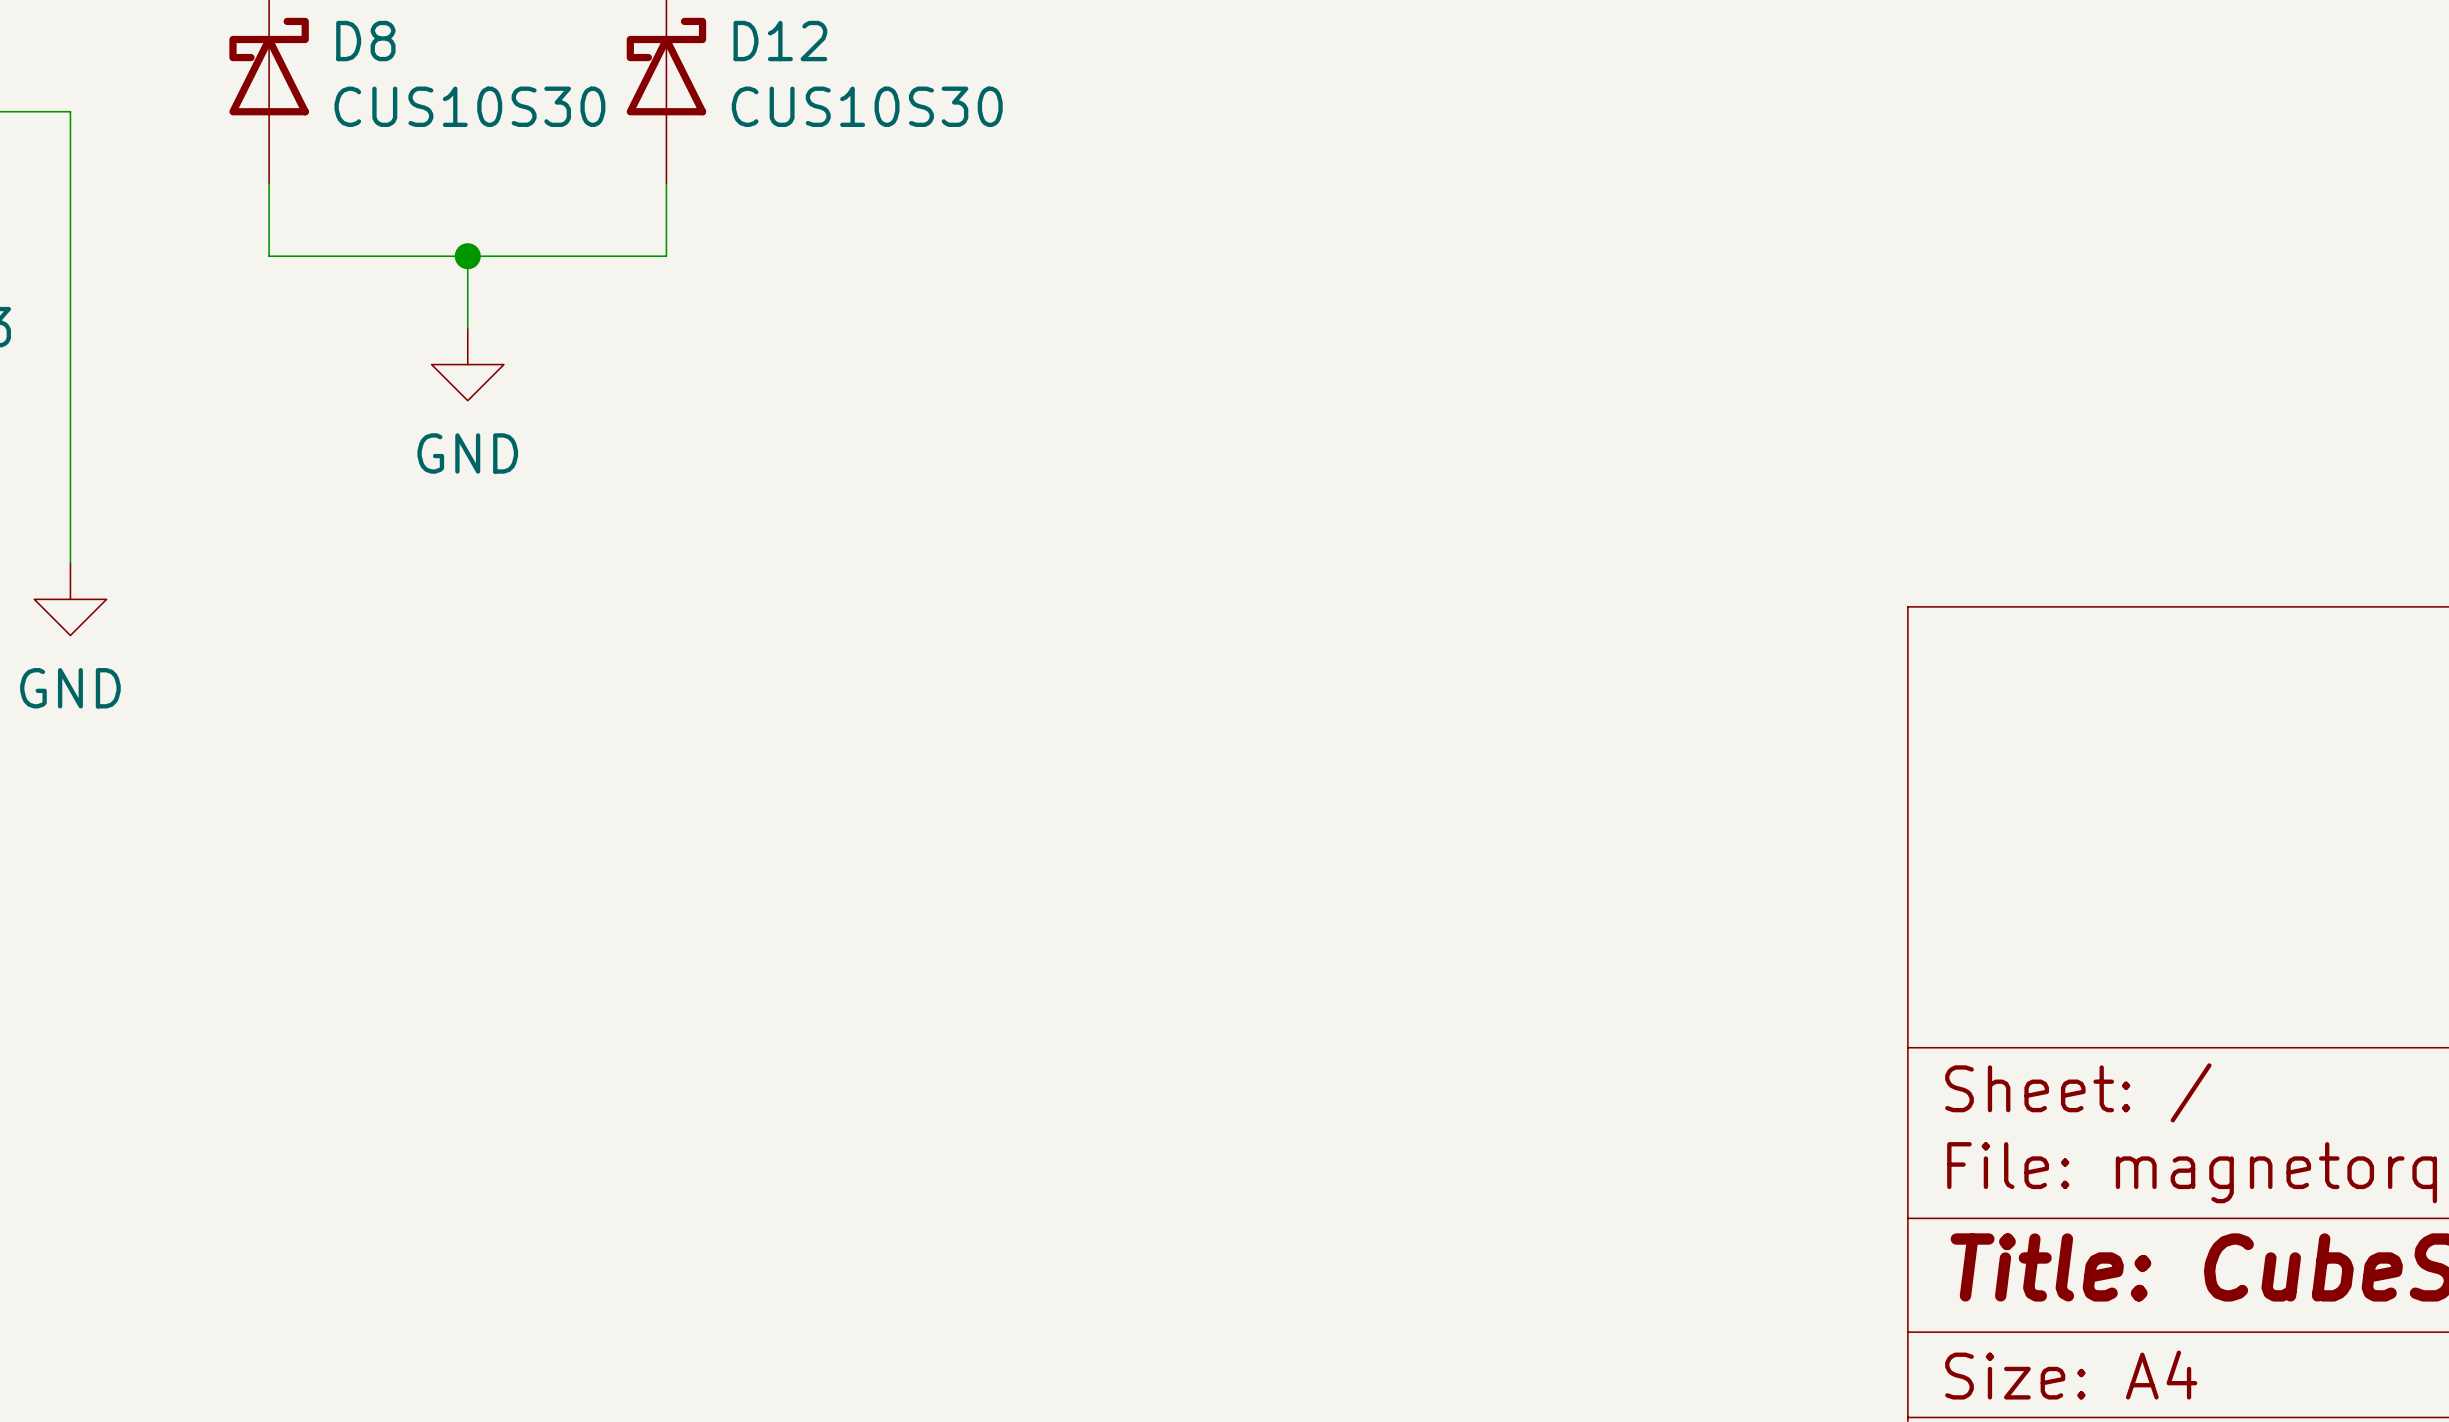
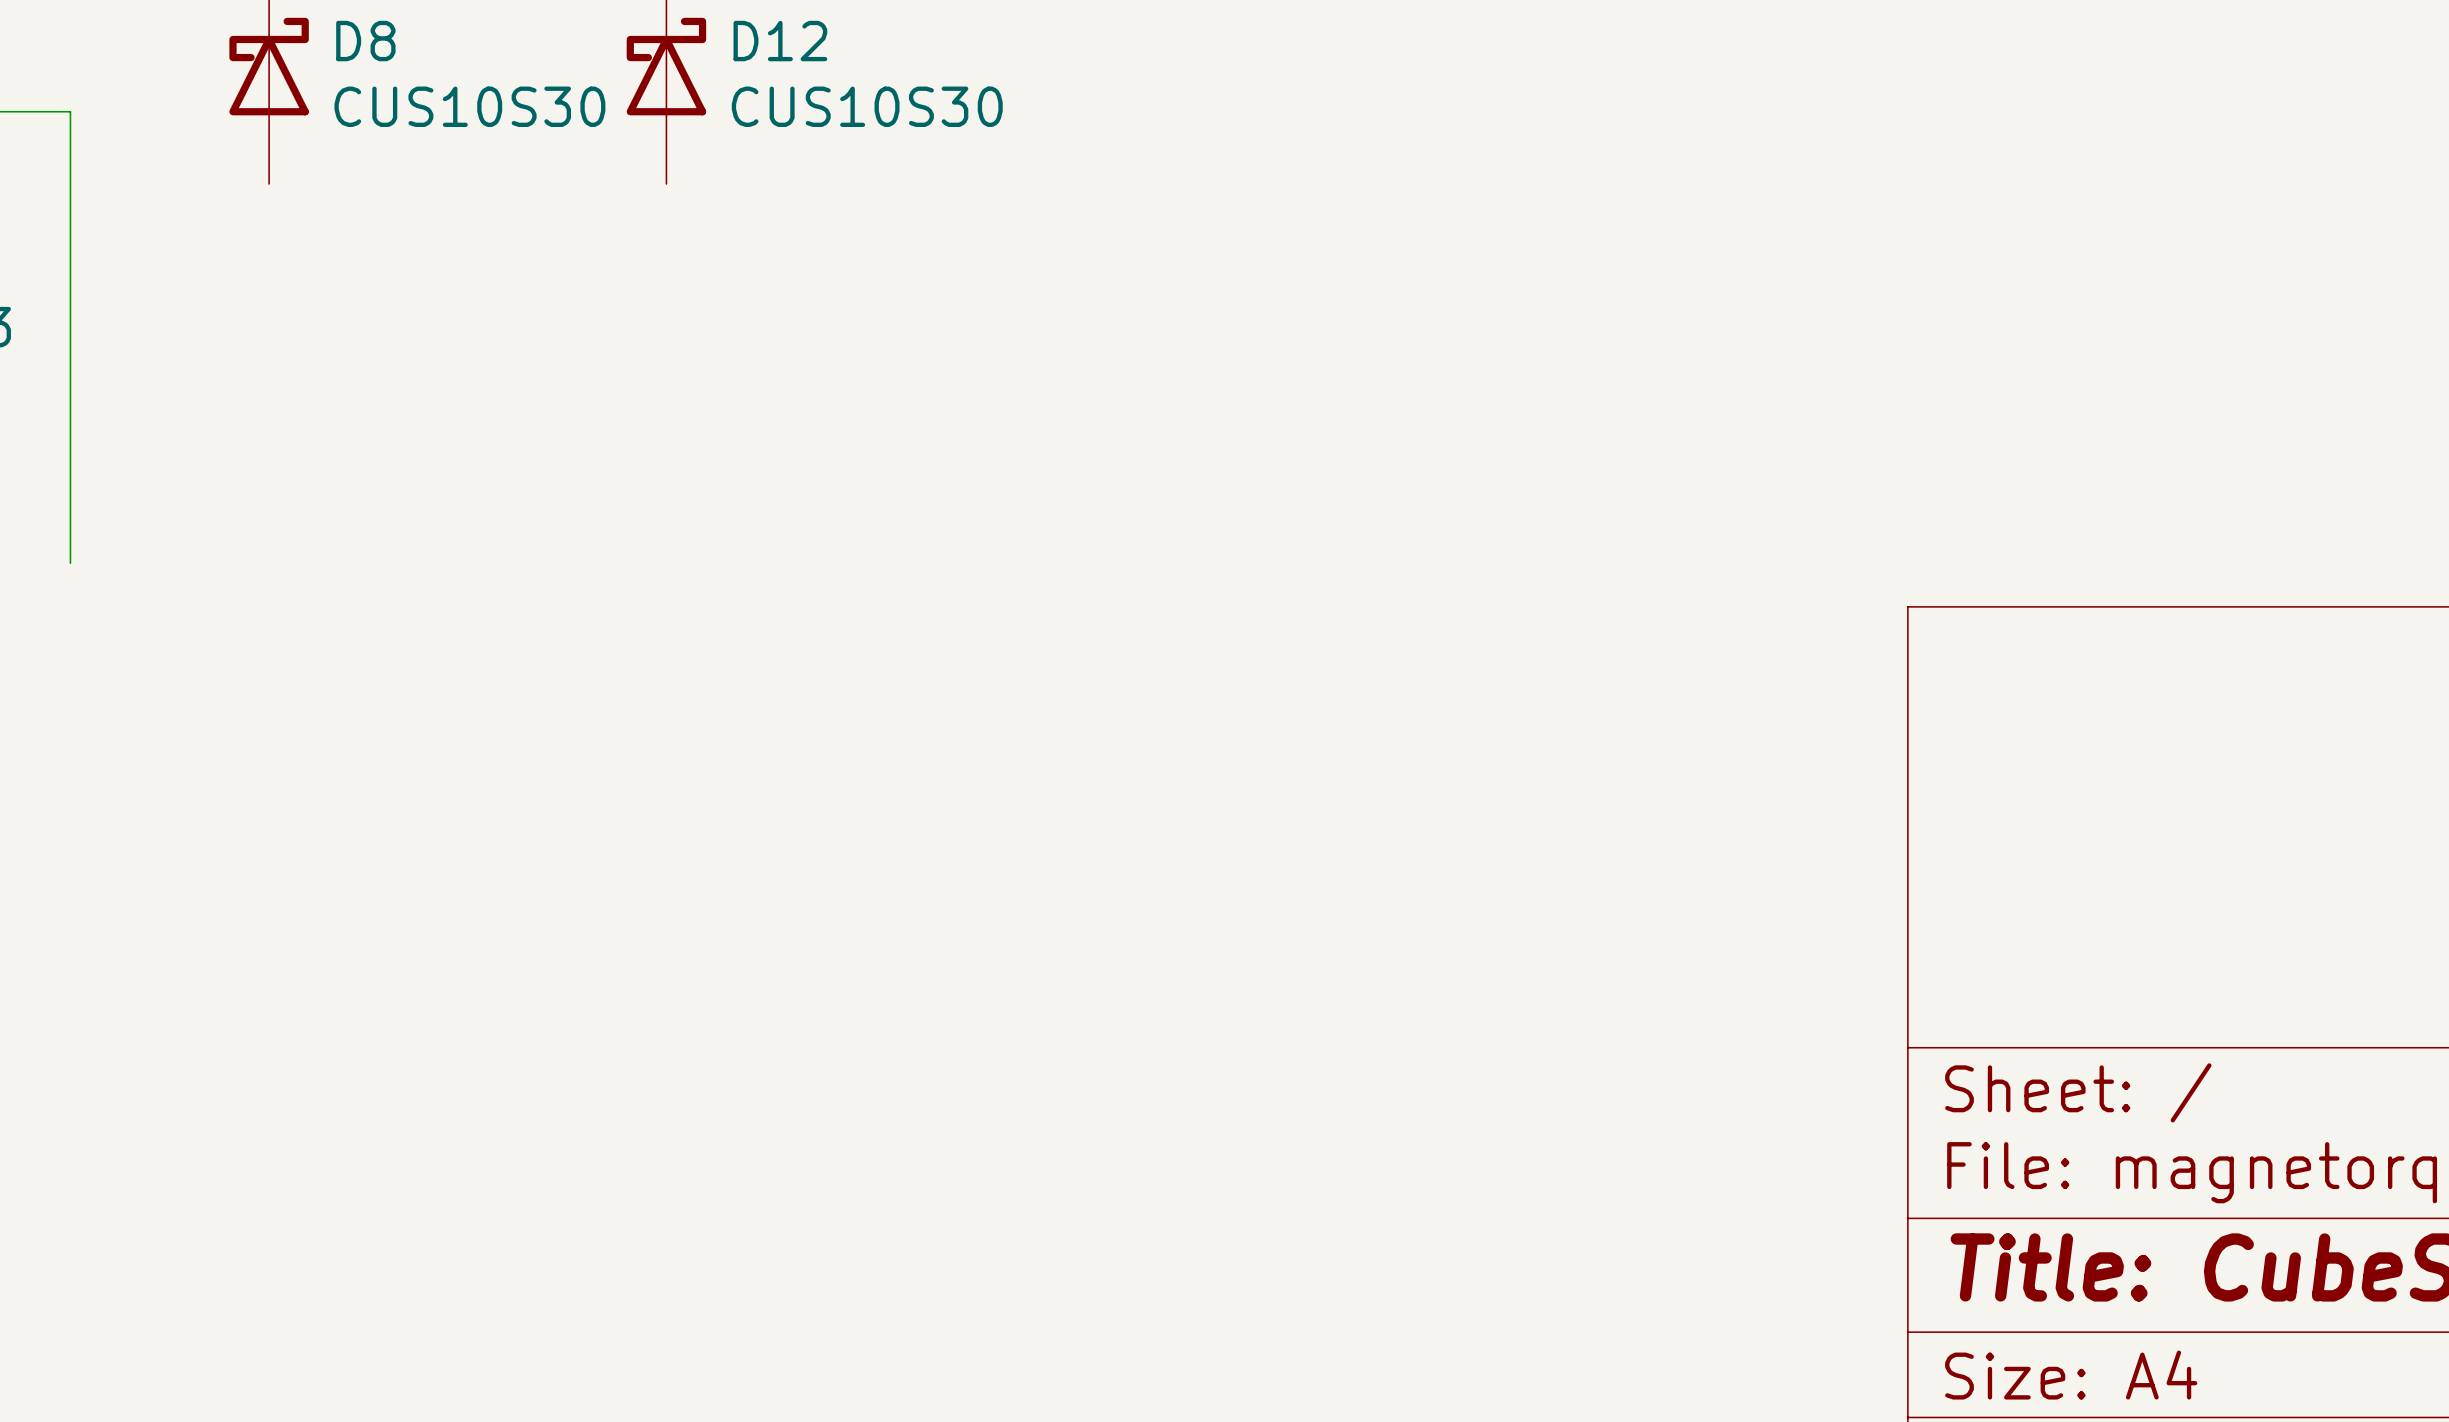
wire: (269, 183) (269, 256) (666, 256) (666, 183) -> none
wire: (467, 256) (467, 328) -> none
junction: (467, 256) -> none
power symbol: GND (467, 364) -> none
power symbol: GND (70, 599) -> none

